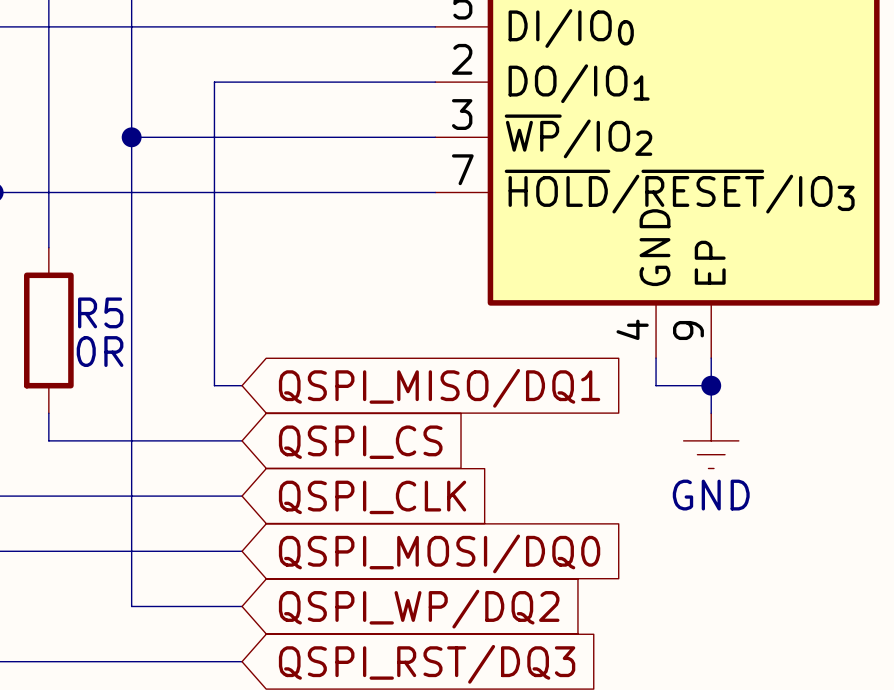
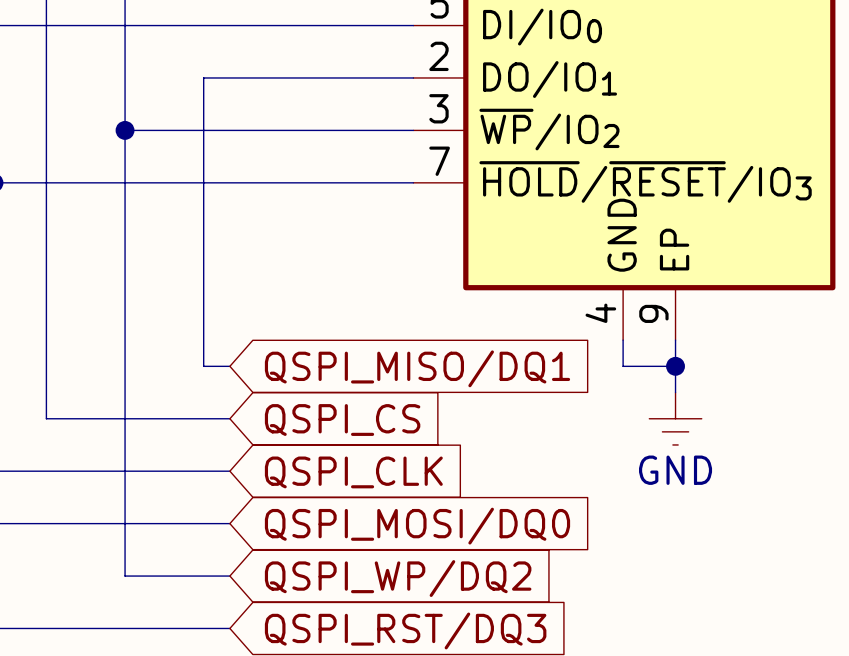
wire: none -> (46, 235) (46, 392)
R5: 0R (48, 330) -> none

